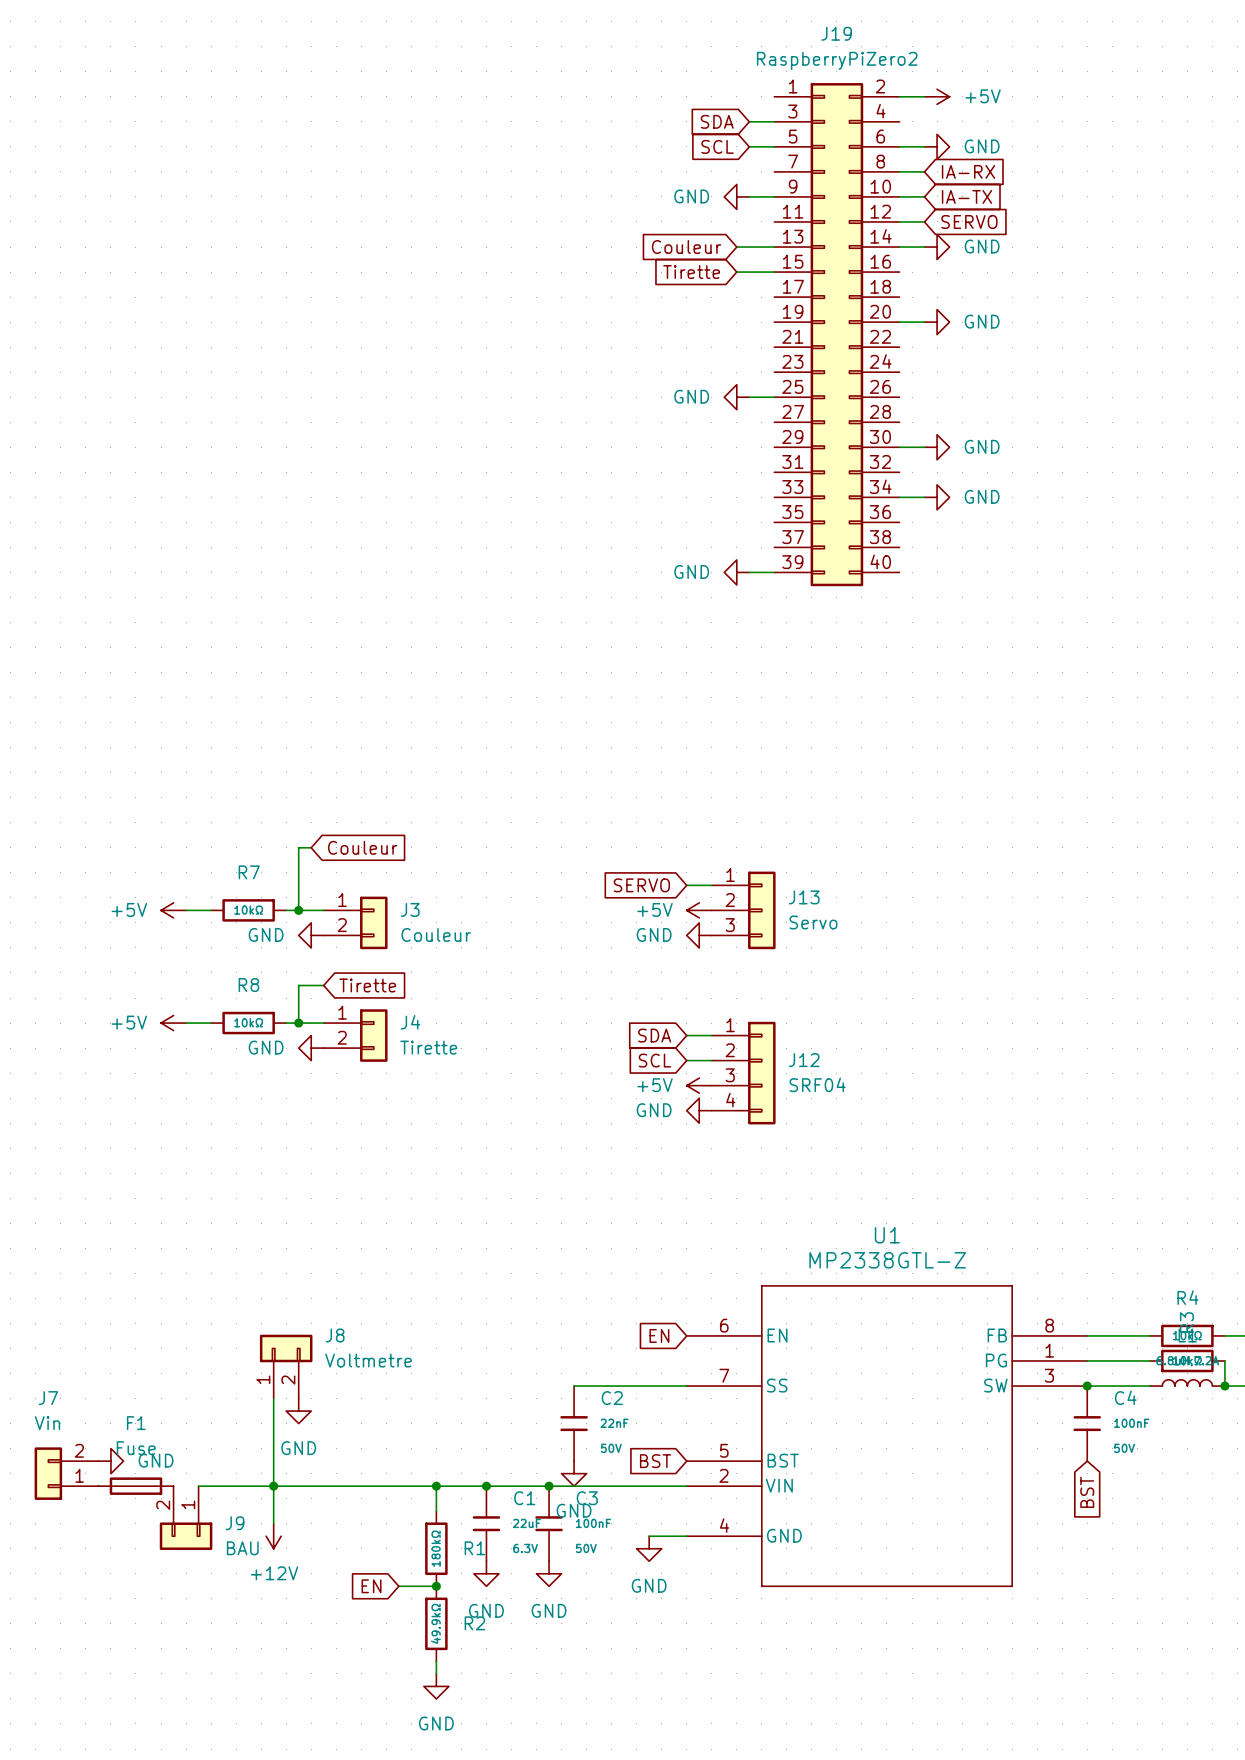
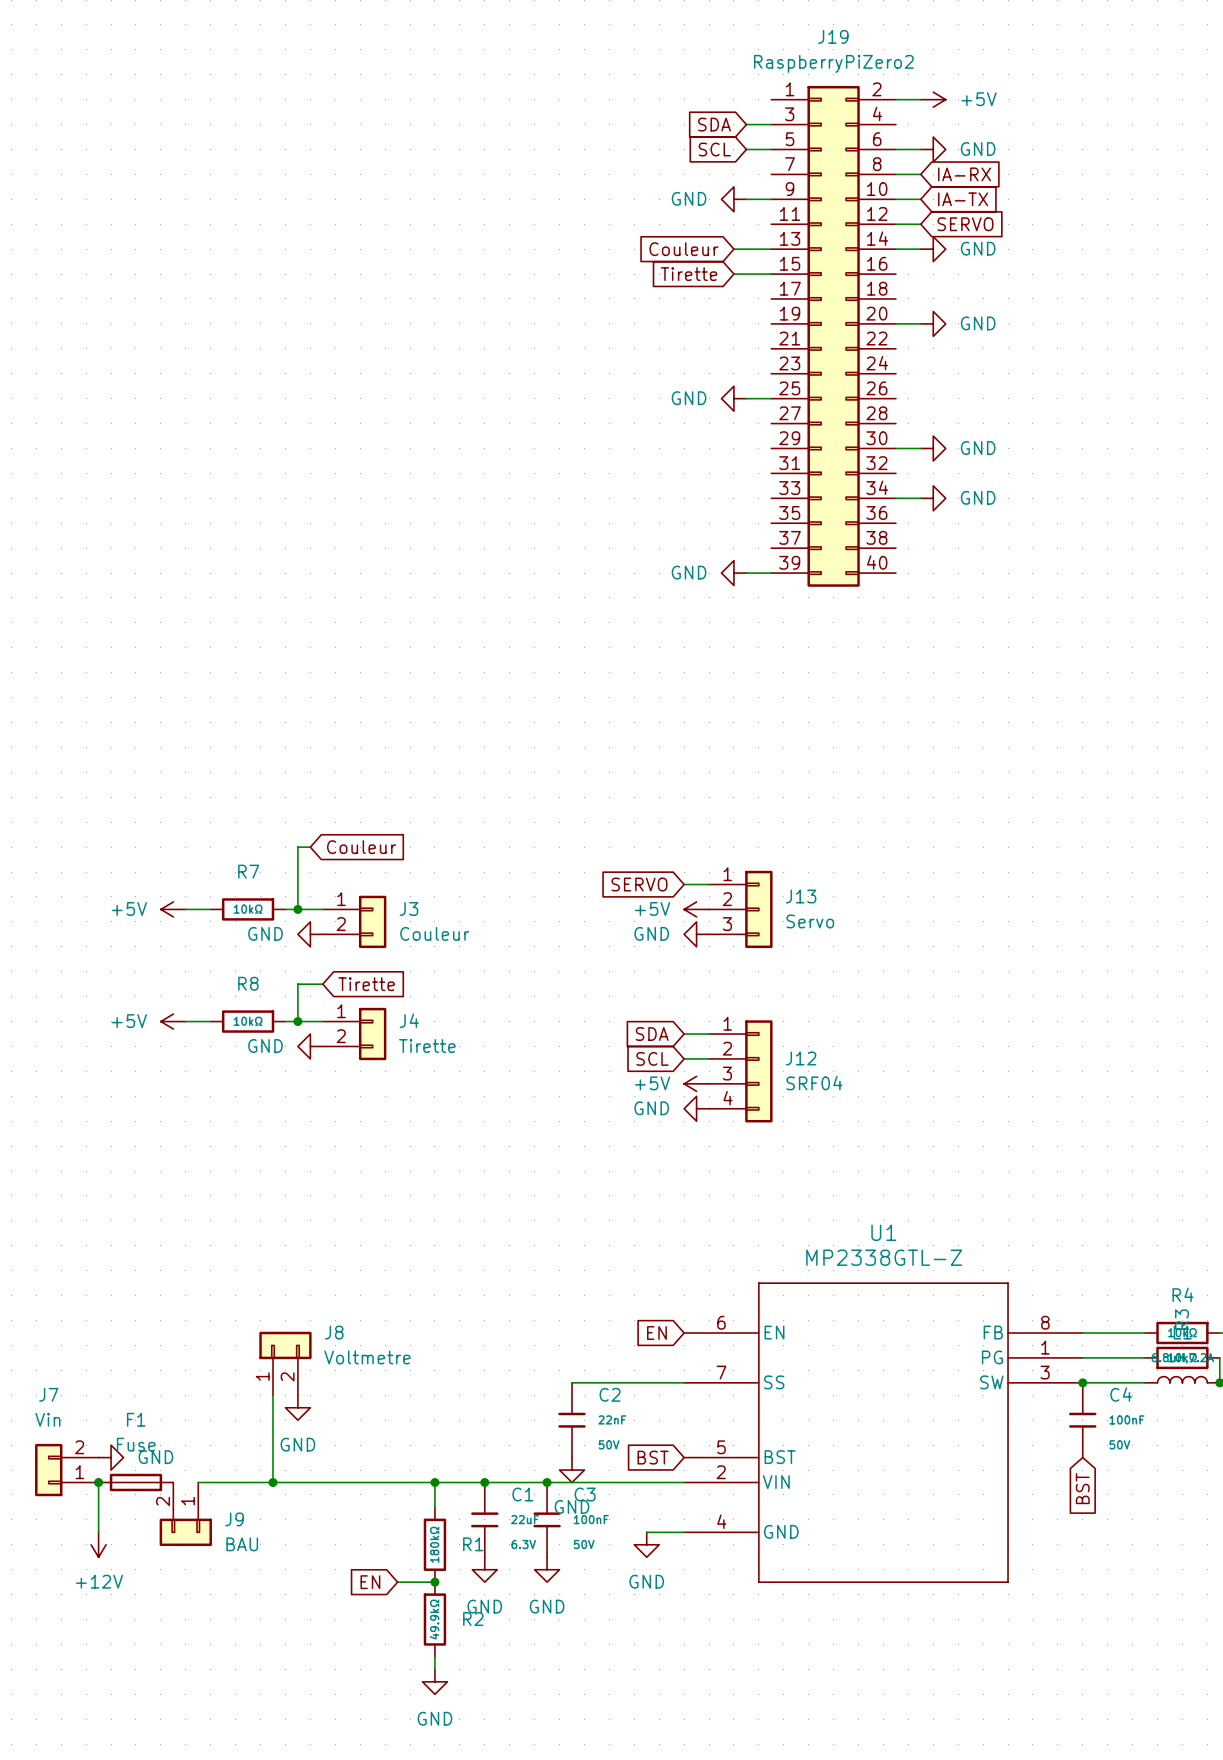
wire: none -> (98, 1482) (98, 1532)
junction: none -> (98, 1482)
wire: (273, 1486) (273, 1523) -> none
power symbol position: +12V (273, 1536) -> +12V (98, 1544)

